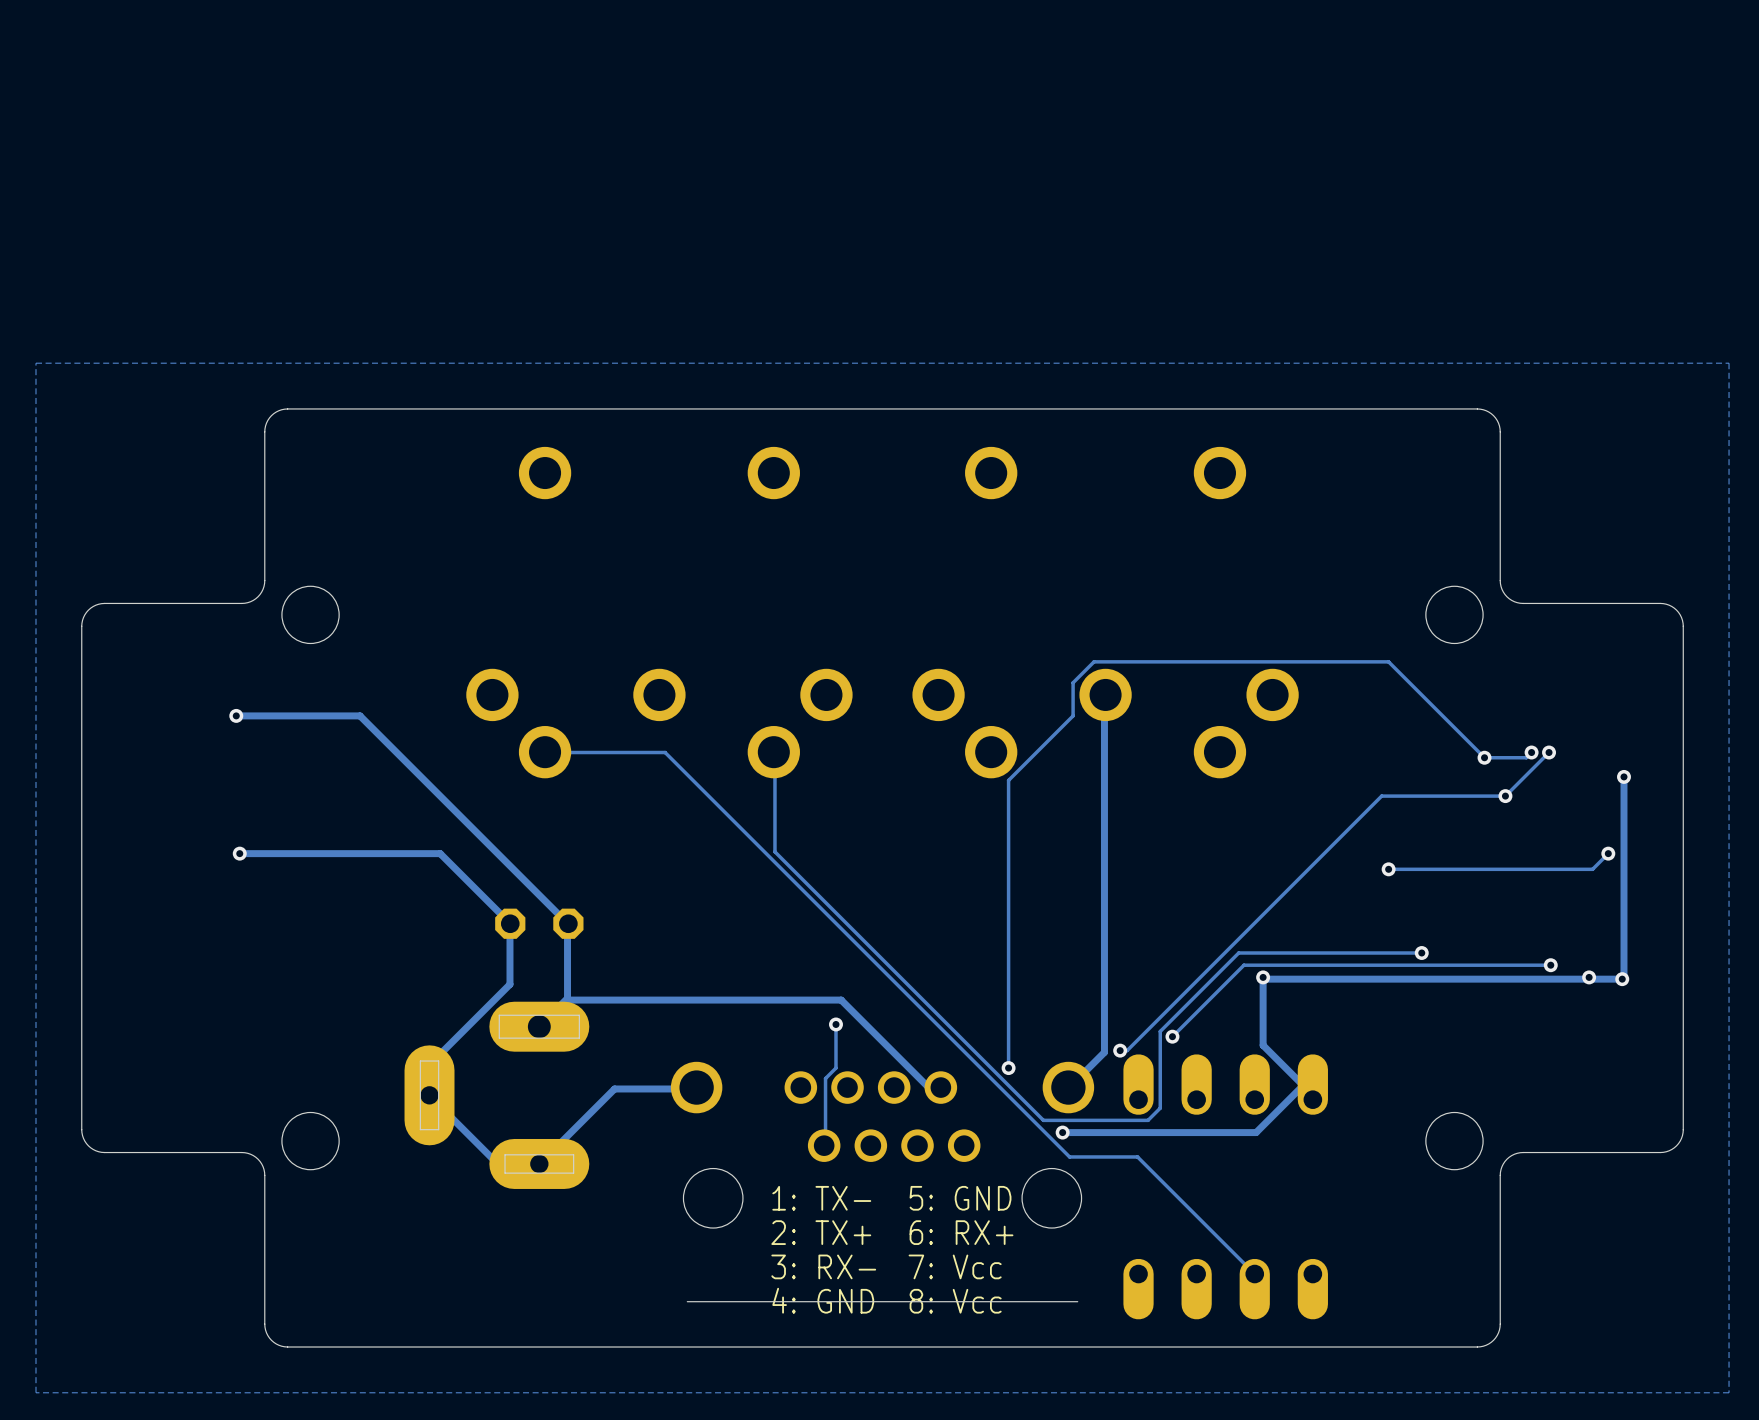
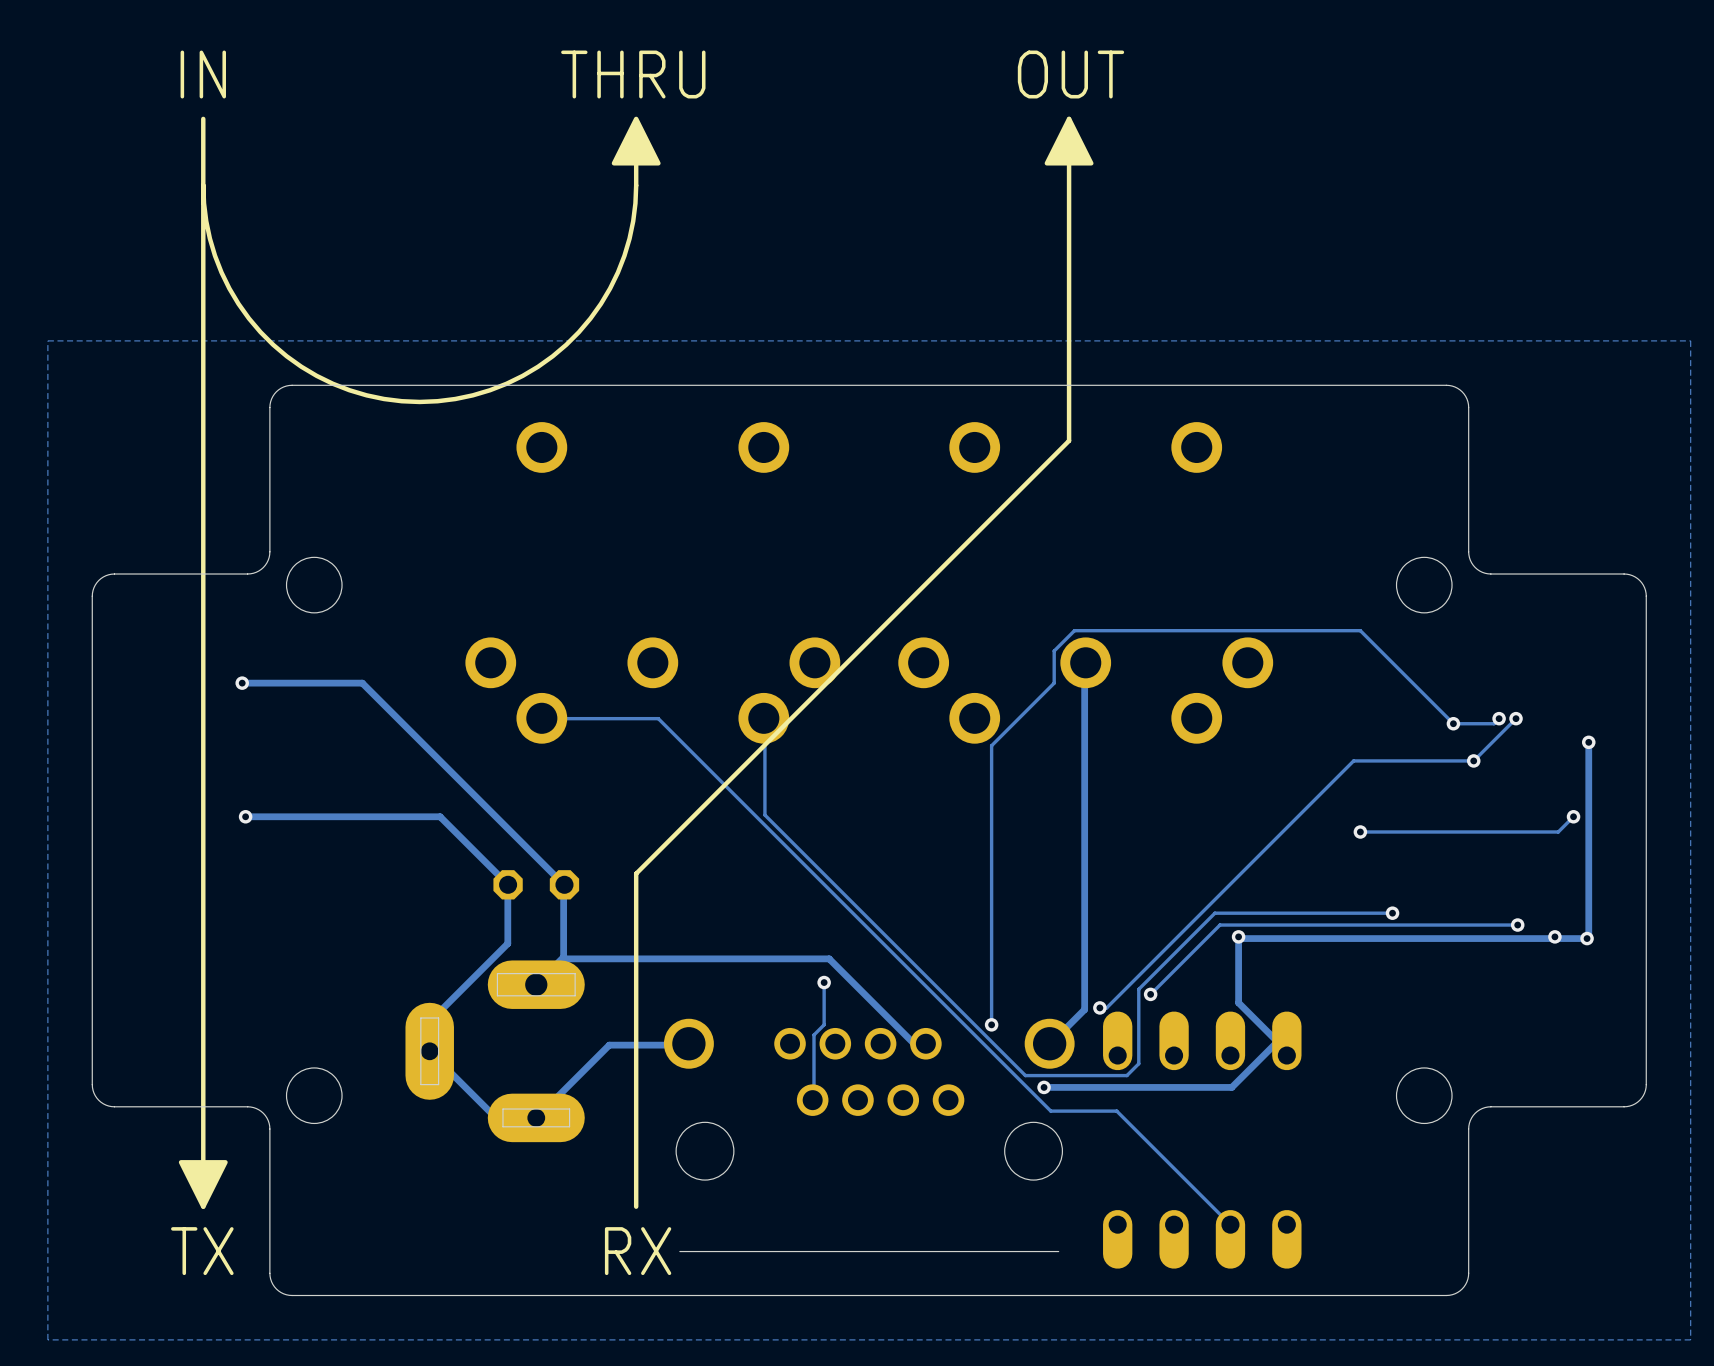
text: none -> IN (203, 74)
text: none -> THRU (633, 74)
text: none -> OUT (1070, 74)
drawing: none -> [611, 116, 661, 166]
drawing: none -> [1044, 116, 1094, 166]
line: none -> (203, 118) (203, 1206)
line: none -> (1069, 118) (1069, 440) (636, 873) (636, 1206)
line: none -> (636, 163) (635, 203) (629, 238) (610, 288) (590, 318) (566, 344) (522, 375) (472, 395) (437, 401) (401, 401) (349, 390) (316, 375) (273, 344) (248, 318) (221, 272) (209, 238) (203, 185)
text: 1: TX- (821, 1198) -> none
text: 5: GND (960, 1198) -> none
drawing: none -> [178, 1160, 228, 1209]
text: 2: TX+ (821, 1232) -> none
text: 6: RX+ (961, 1232) -> none
text: 3: RX- (823, 1266) -> none
text: 7: Vcc (955, 1266) -> none
text: 4: GND (823, 1300) -> none
text: none -> TX (202, 1251)
text: none -> RX (638, 1251)
text: 8: Vcc (955, 1301) -> none

